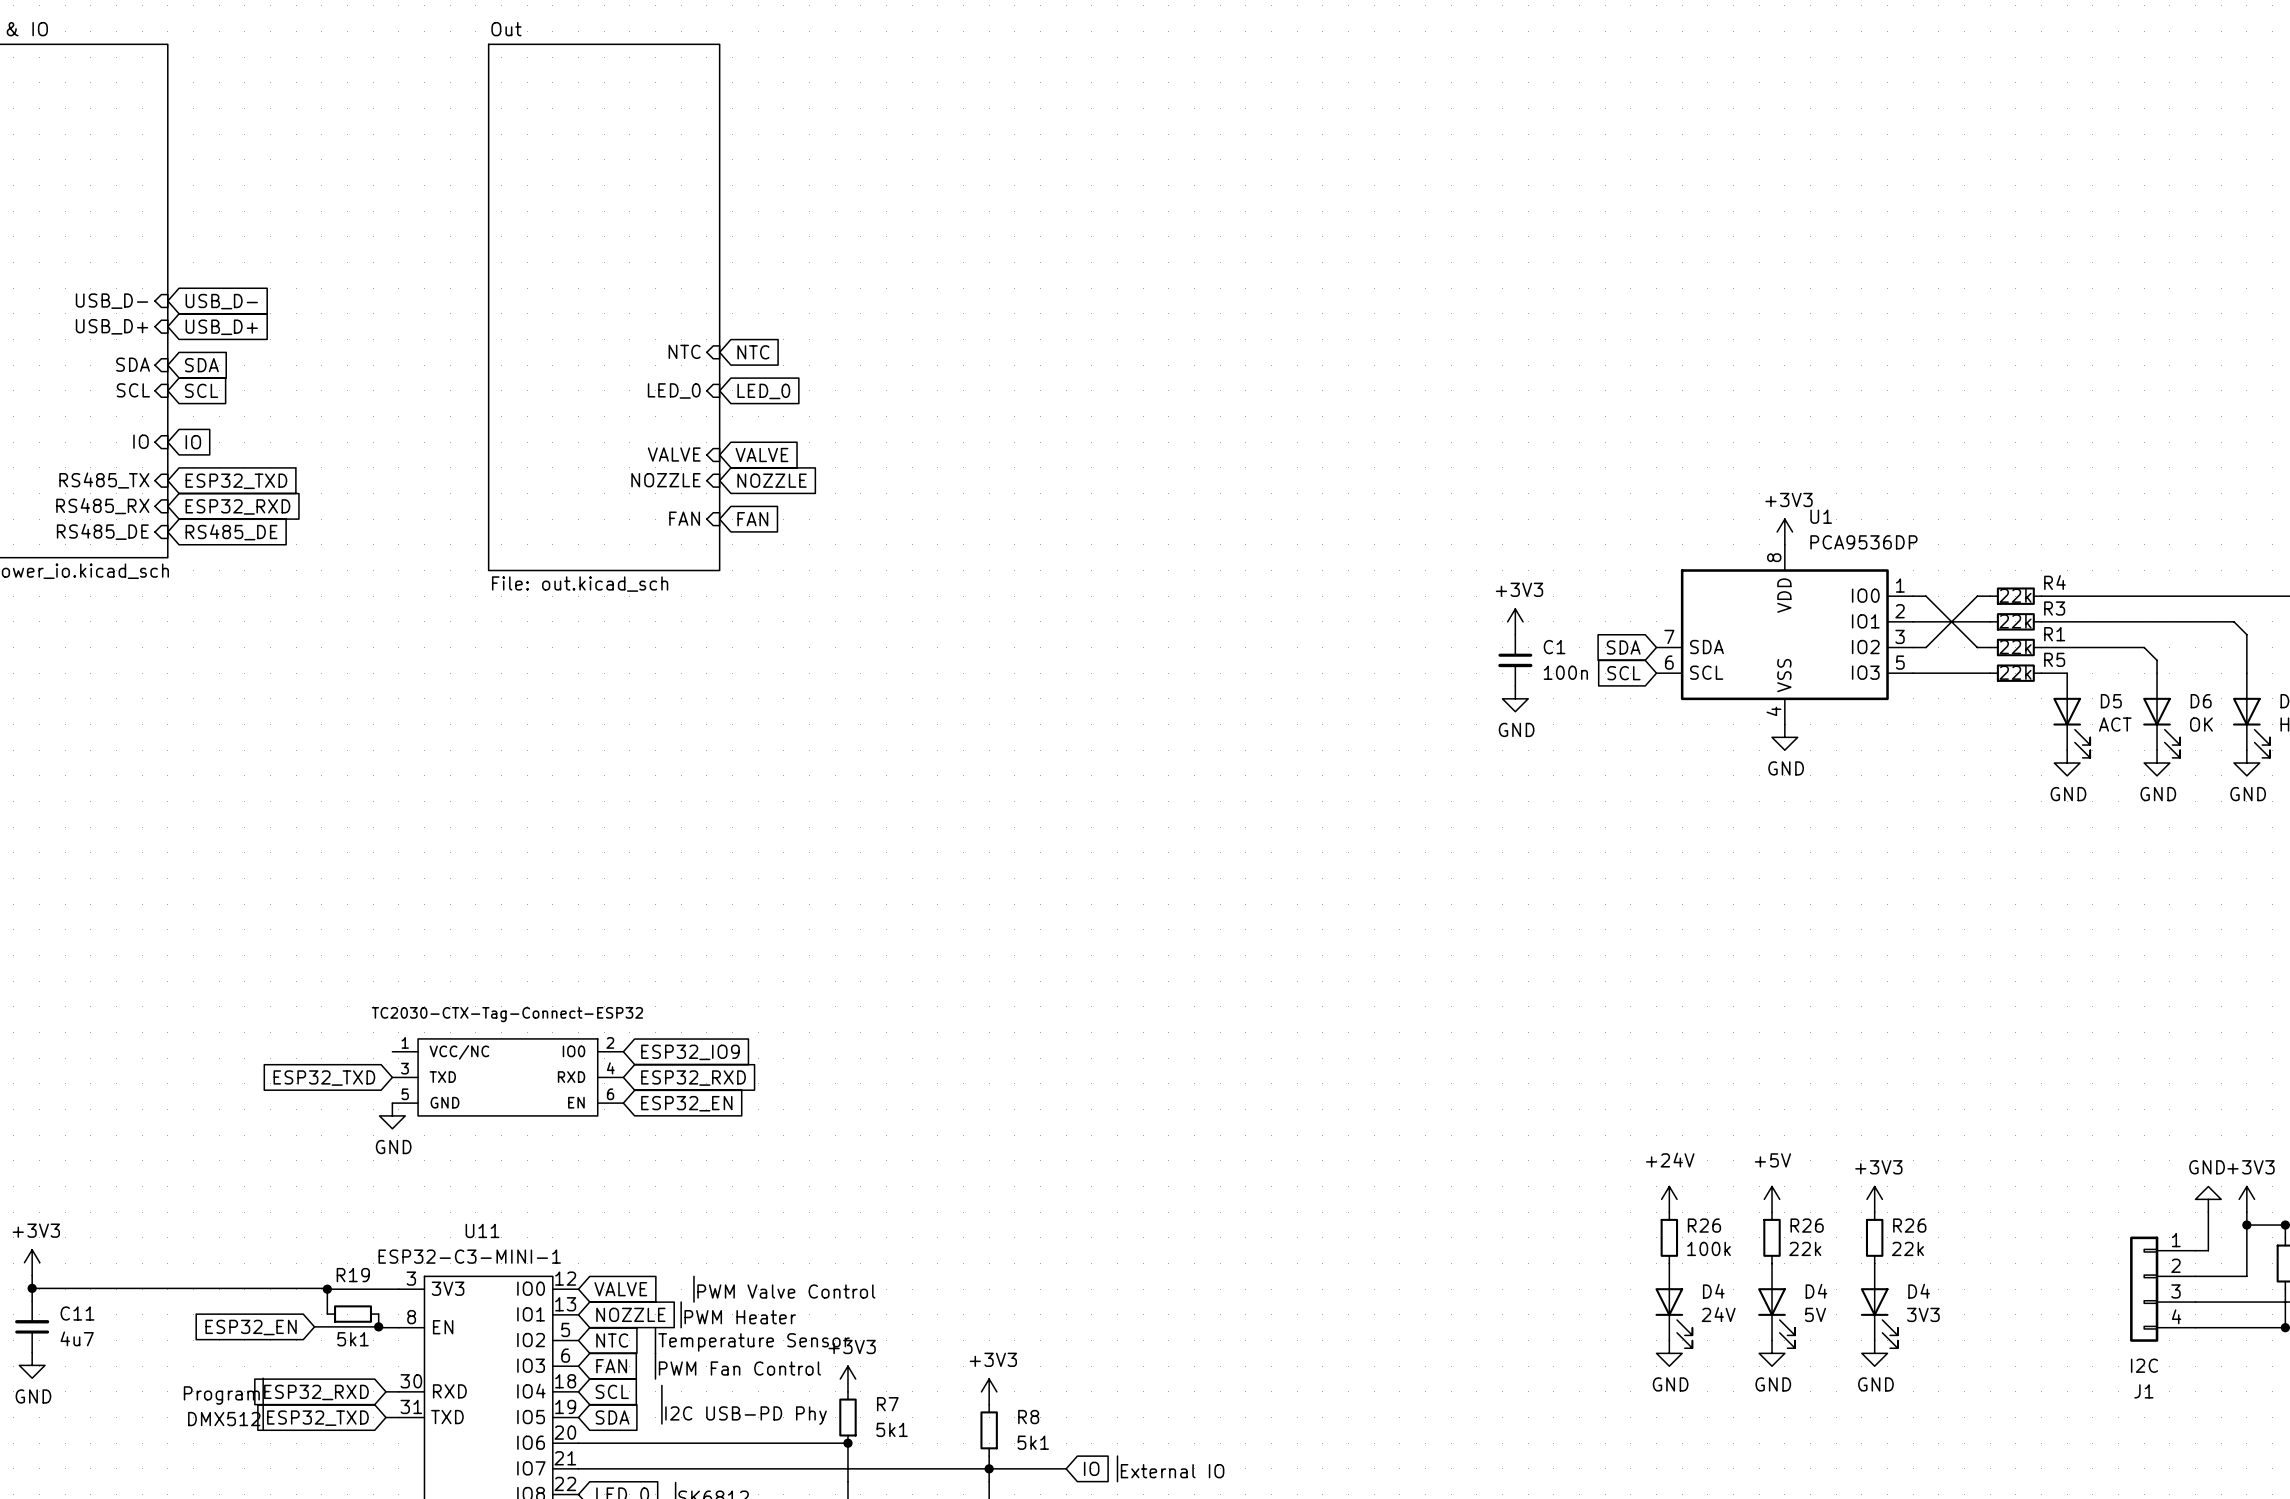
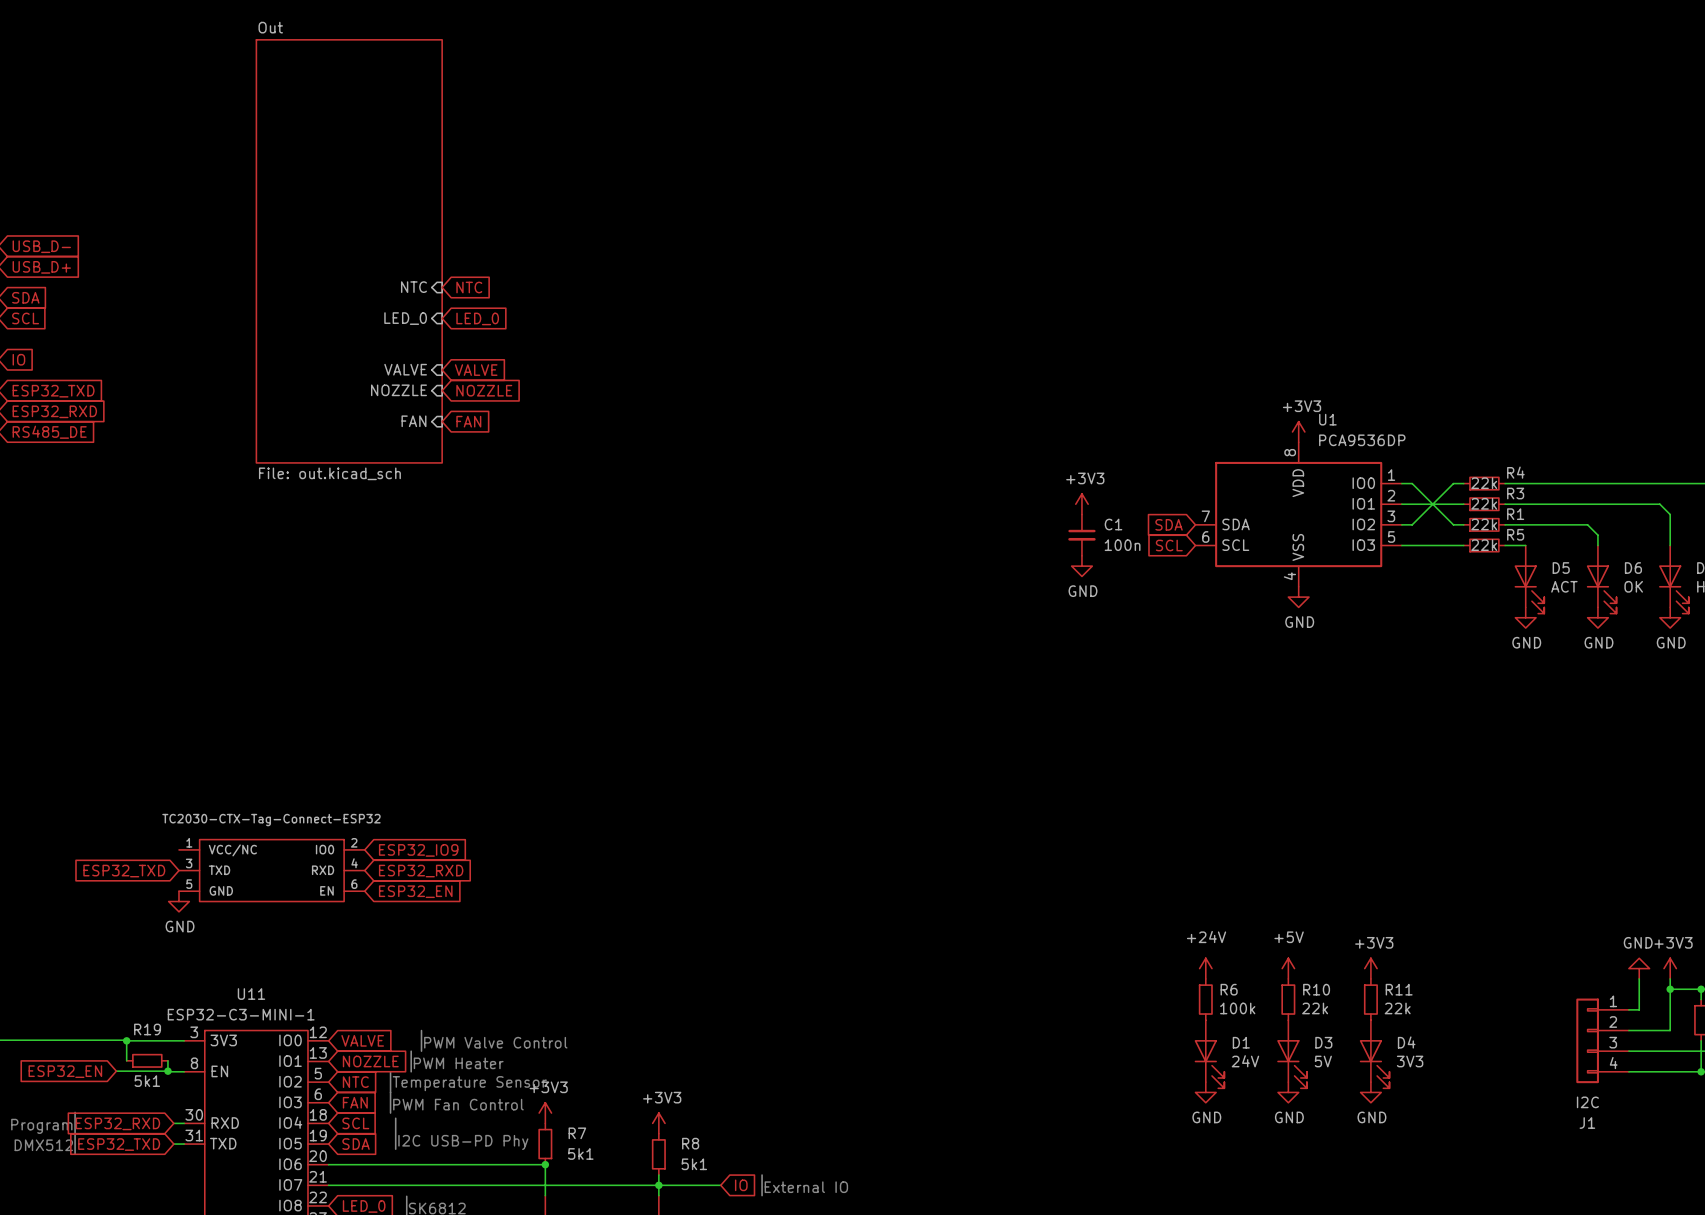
R26 name: R26 (1704, 1225) -> R6 (1229, 989)
R26 name: R26 (1807, 1225) -> R10 (1316, 989)
R26 name: R26 (1909, 1225) -> R11 (1399, 989)
D4 name: D4 (1713, 1291) -> D1 (1241, 1042)
D4 name: D4 (1816, 1291) -> D3 (1323, 1042)

